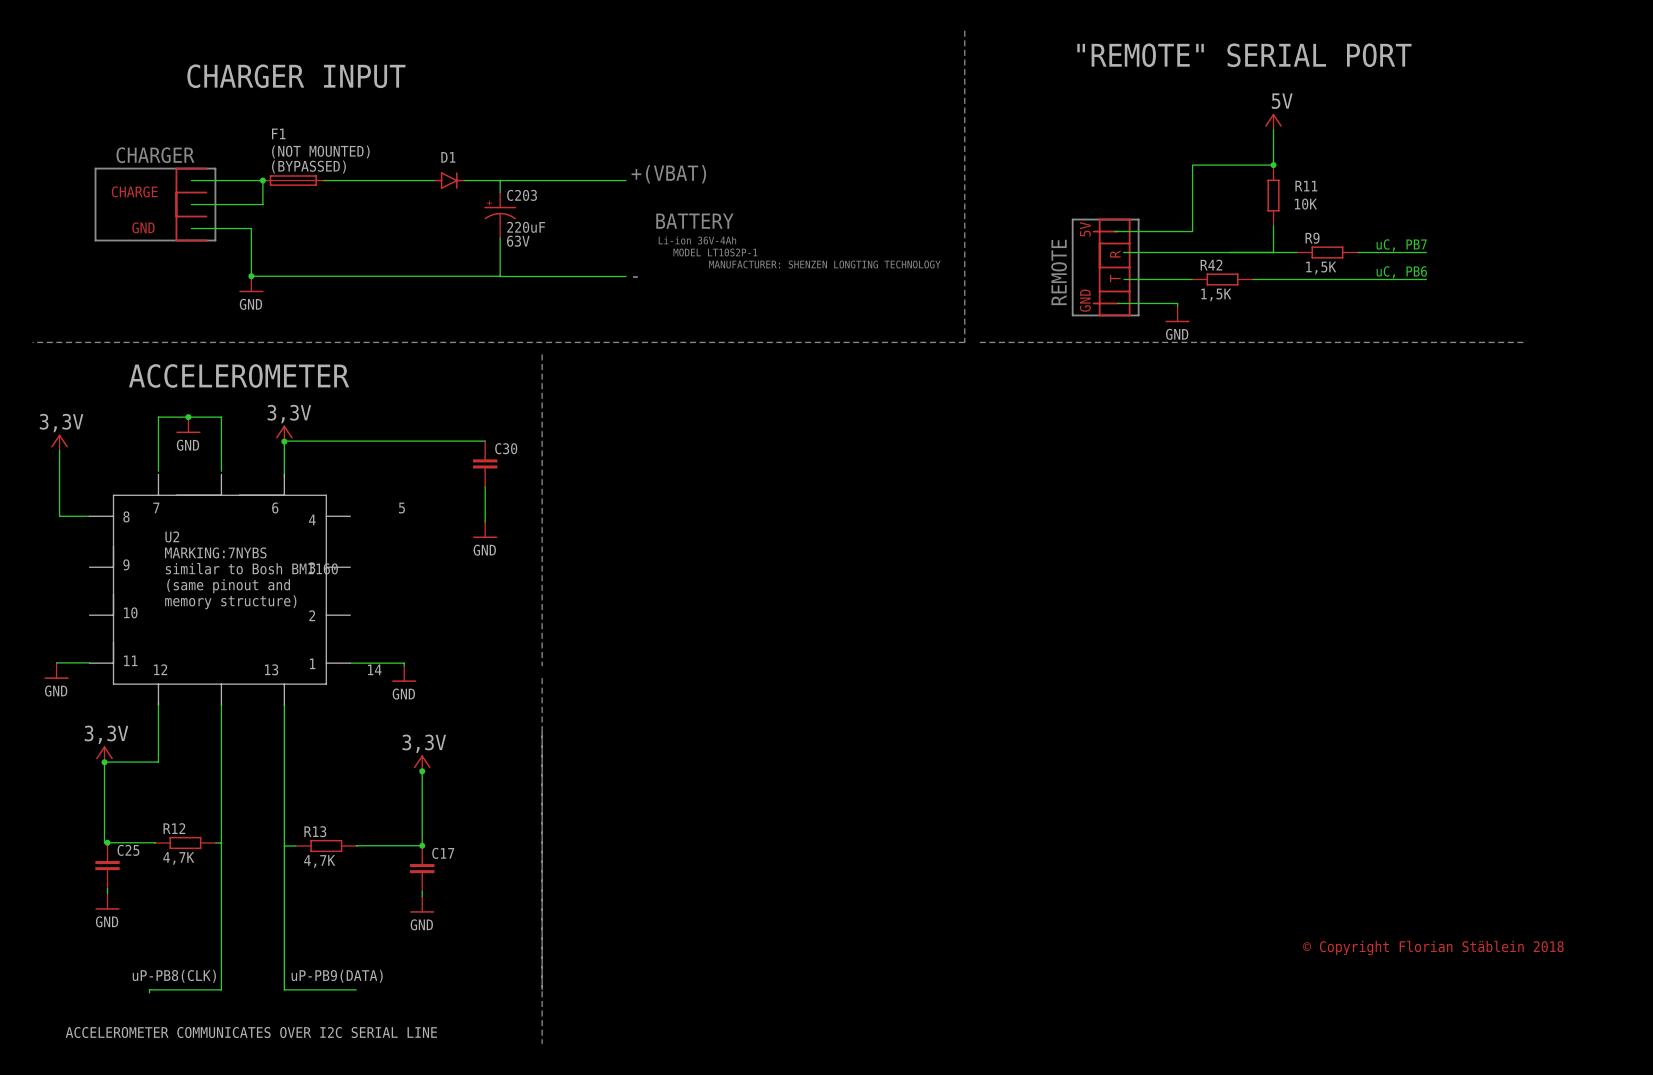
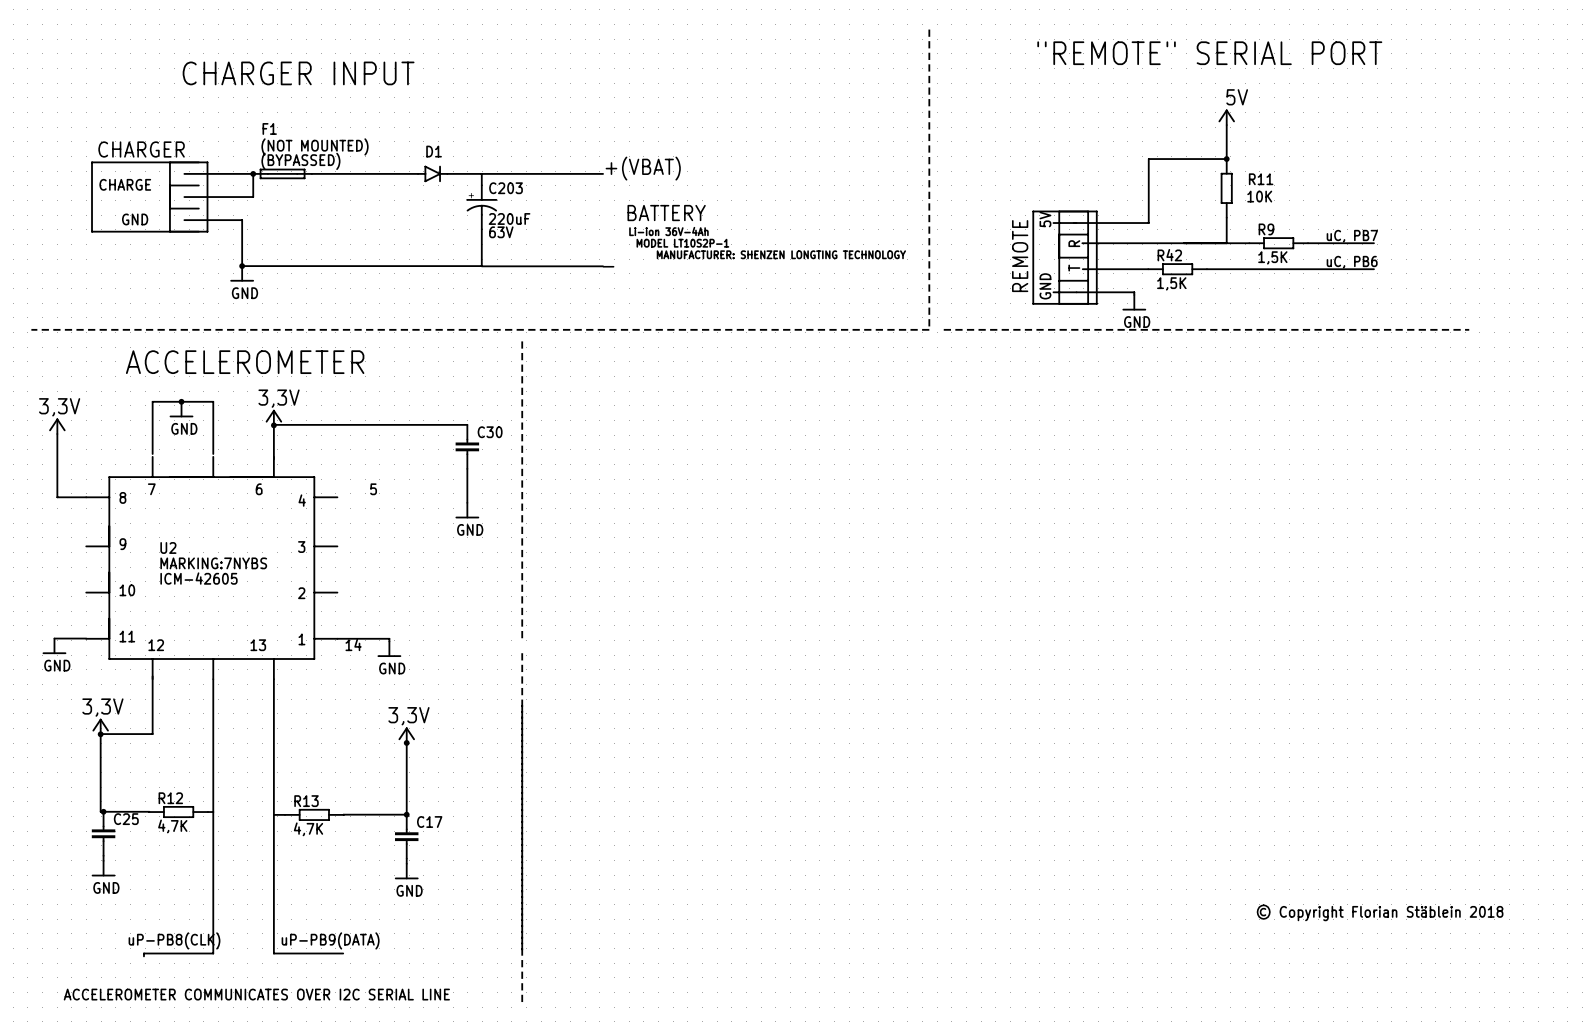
text: U2 (172, 536) -> none
text: MARKING:7NYBS (215, 552) -> none
text: similar to Bosh BMI160 (251, 568) -> U2 (168, 547)
text: (same pinout and (228, 586) -> MARKING:7NYBS (213, 563)
text: memory structure) (230, 602) -> ICM-42605 (199, 578)

